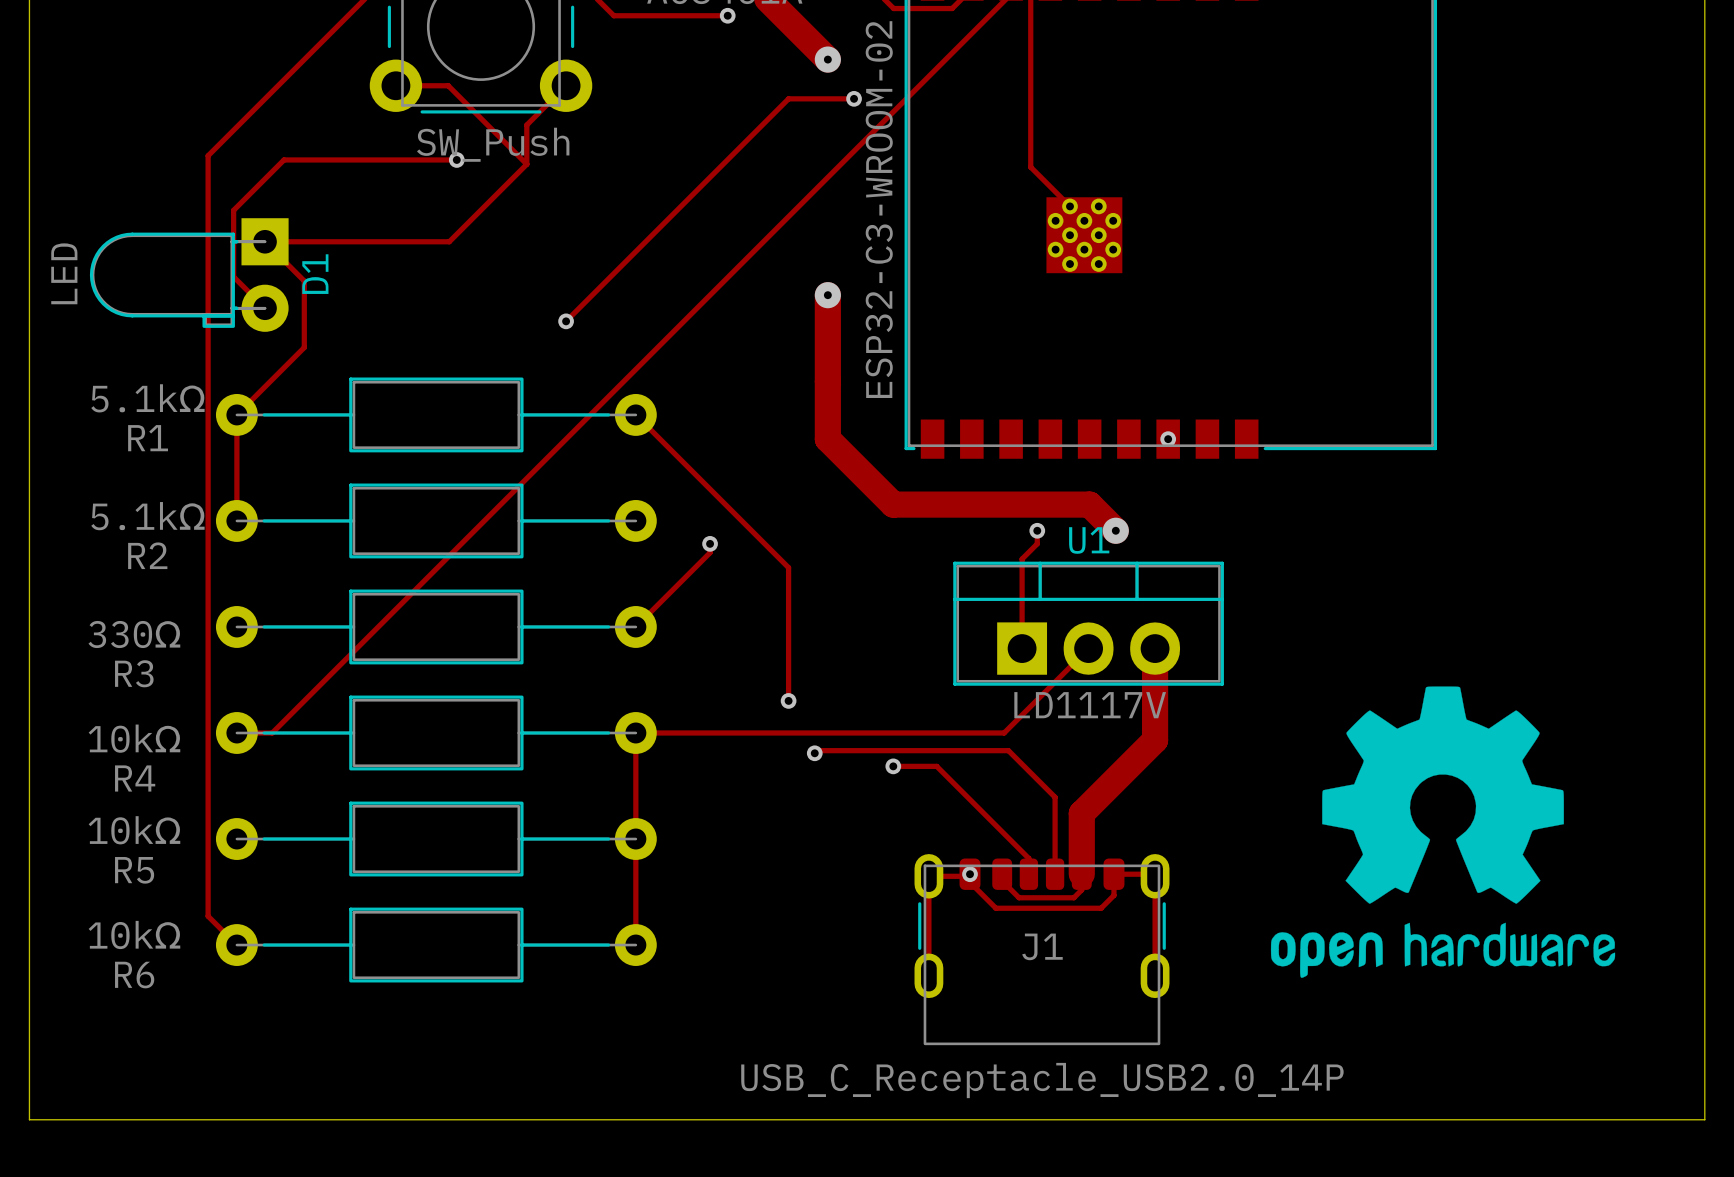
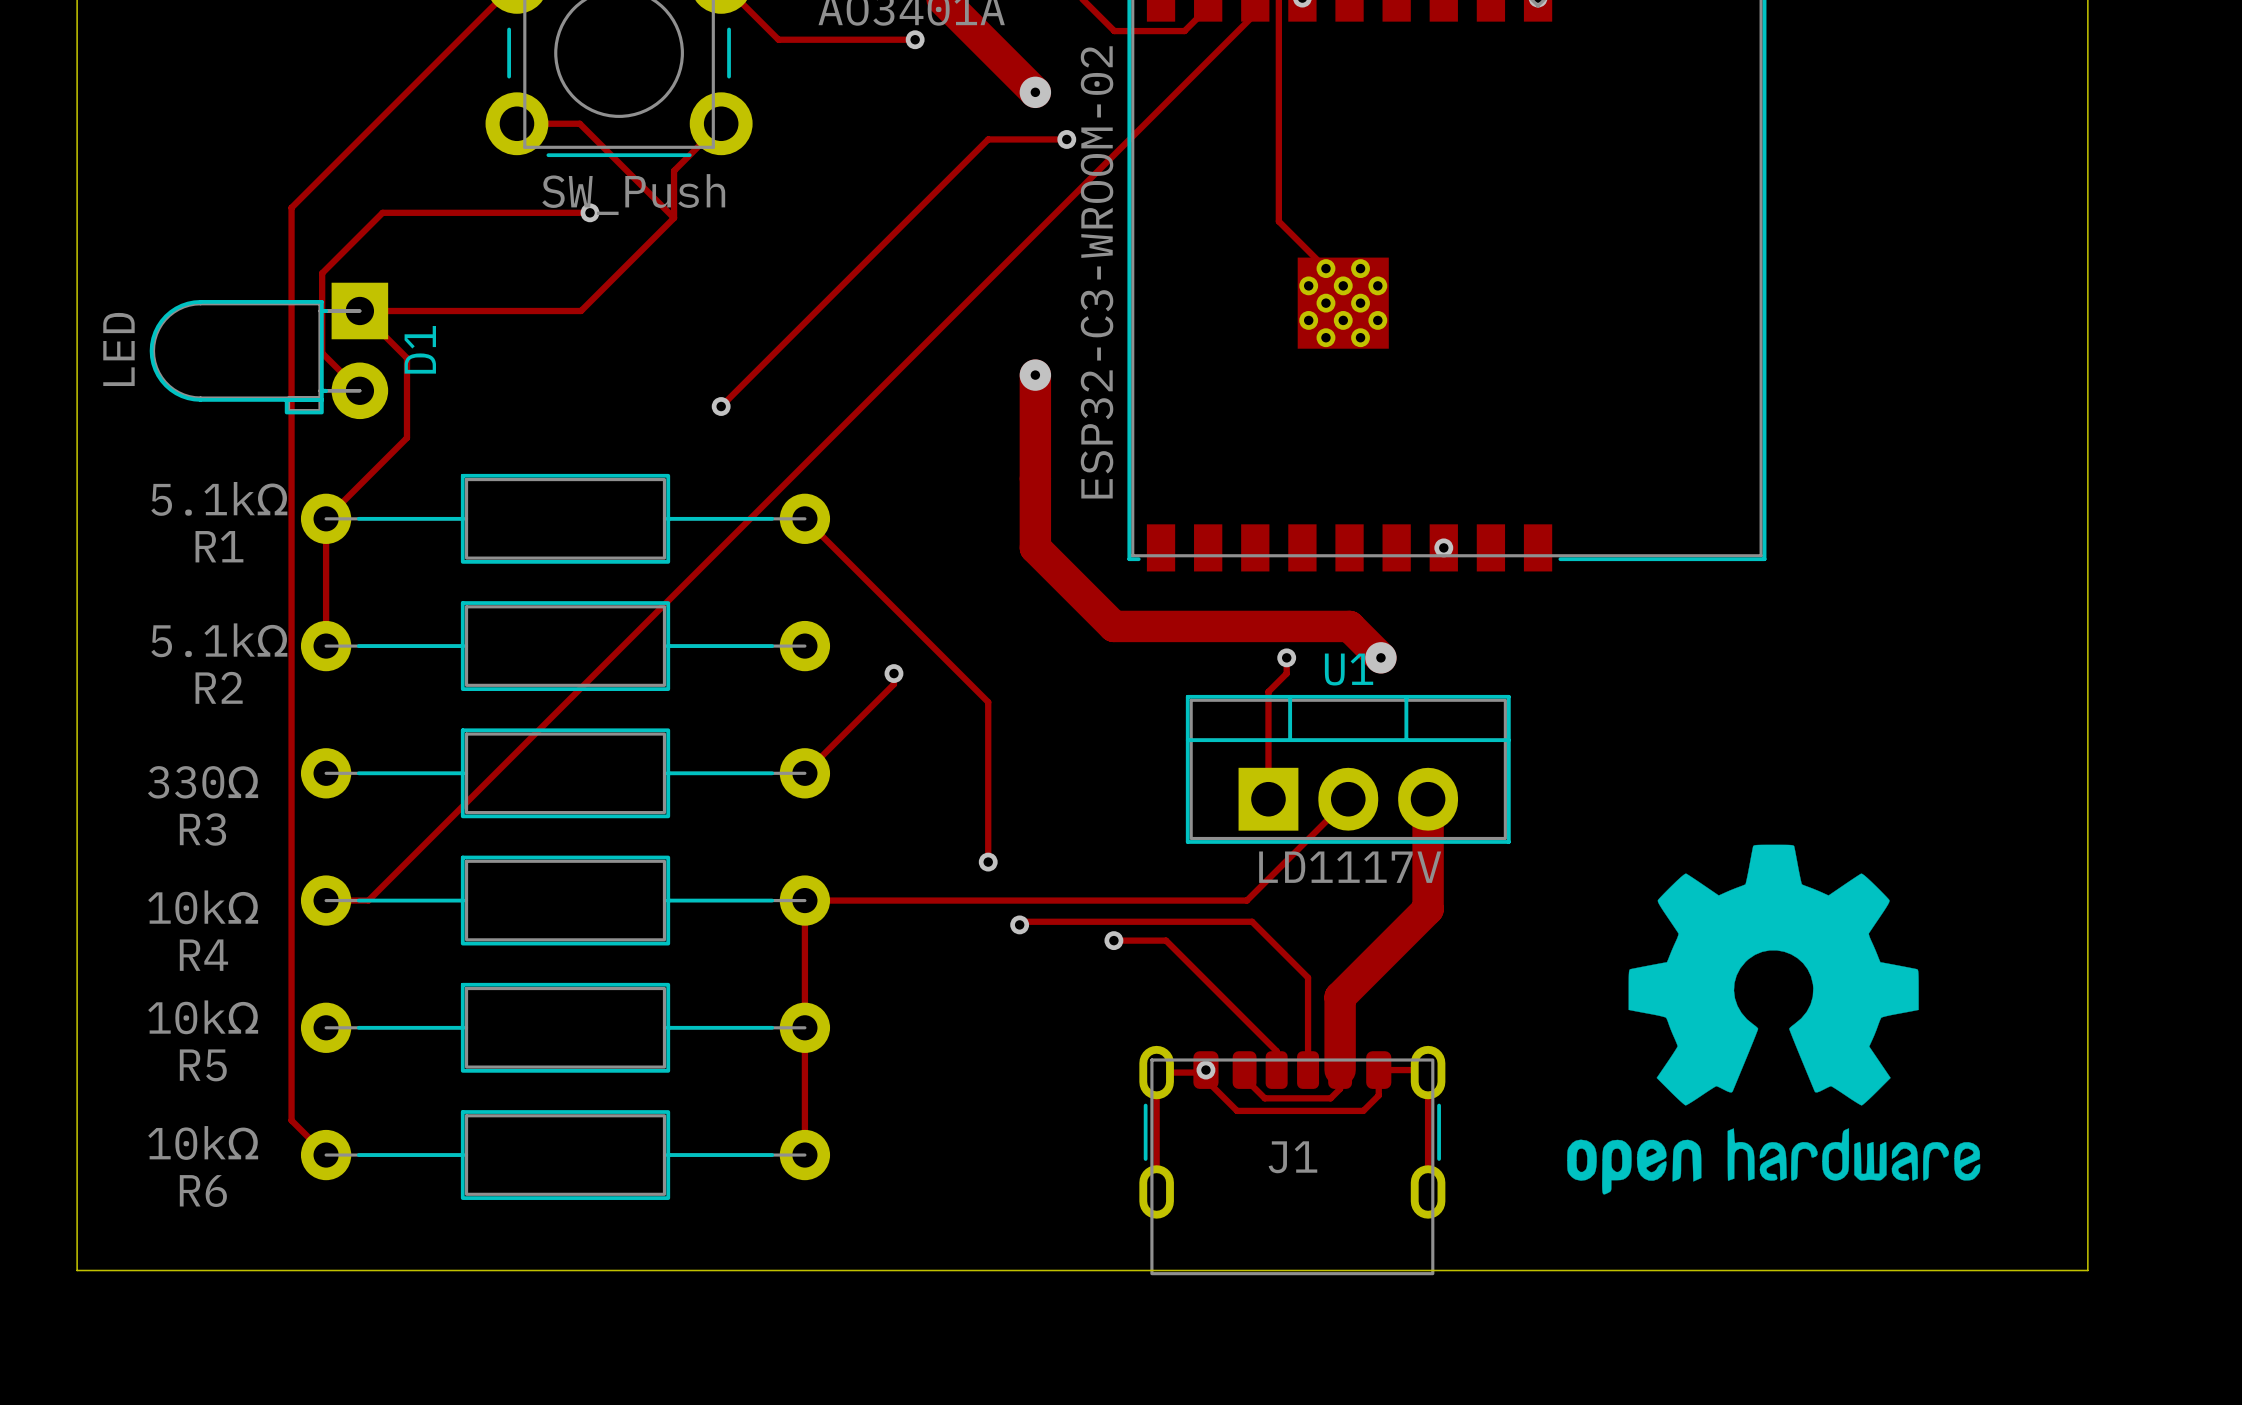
board edge: (29, 1041) (29, 1119) (1704, 1119) (1704, 1041) -> (77, 1270) (2087, 1270)
J1 value: USB_C_Receptacle_USB2.0_14P (1042, 1080) -> none

